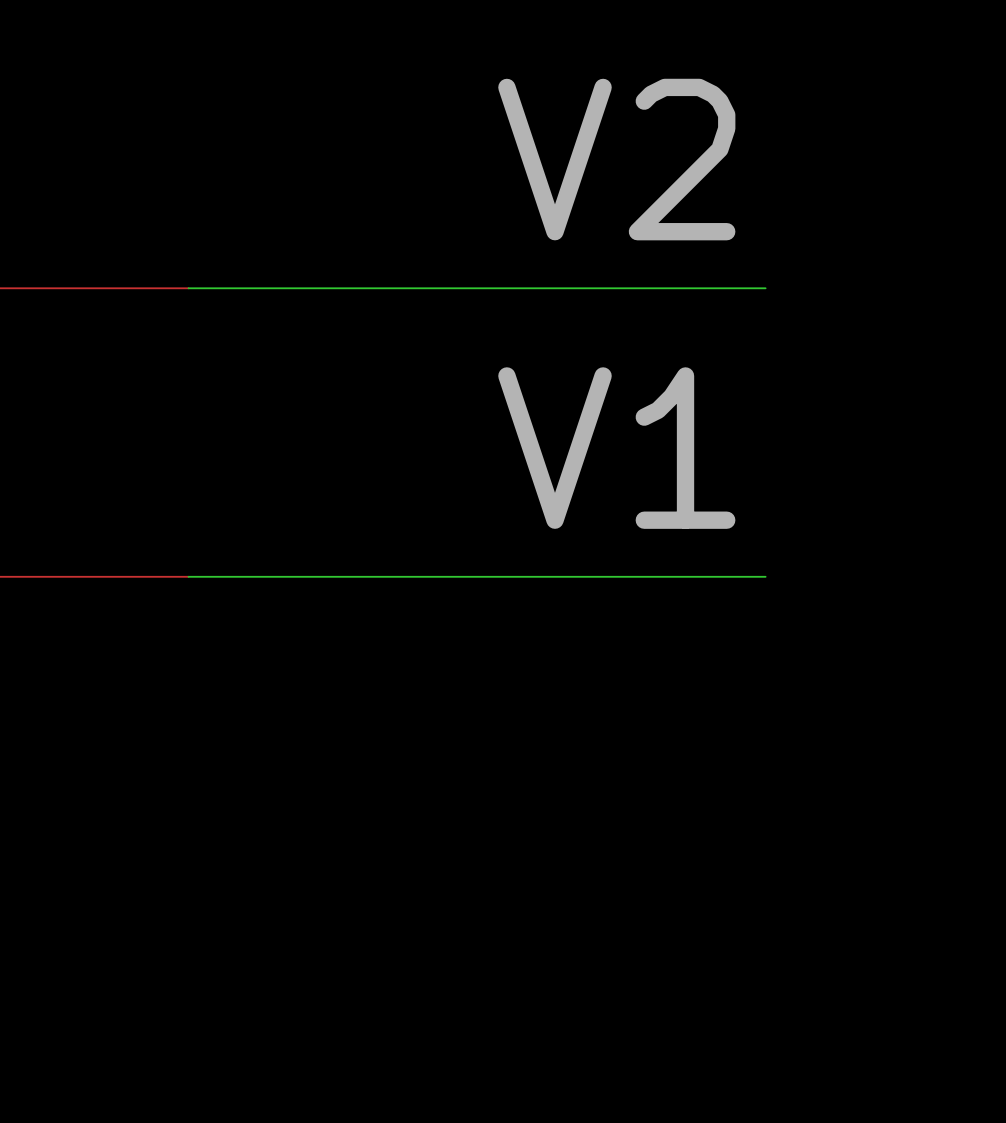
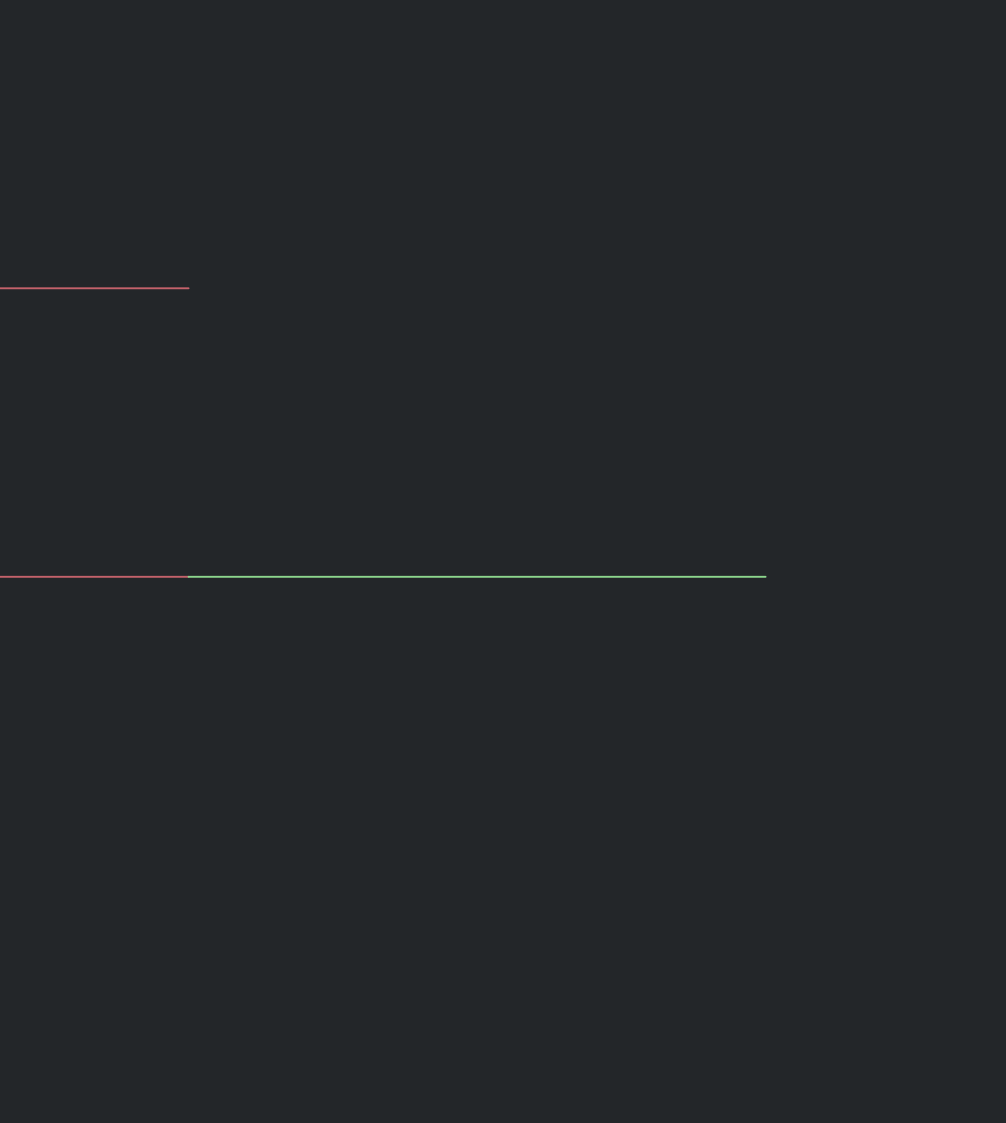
label: V2 (616, 159) -> none
wire: (188, 288) (765, 288) -> none
label: V1 (616, 448) -> none

